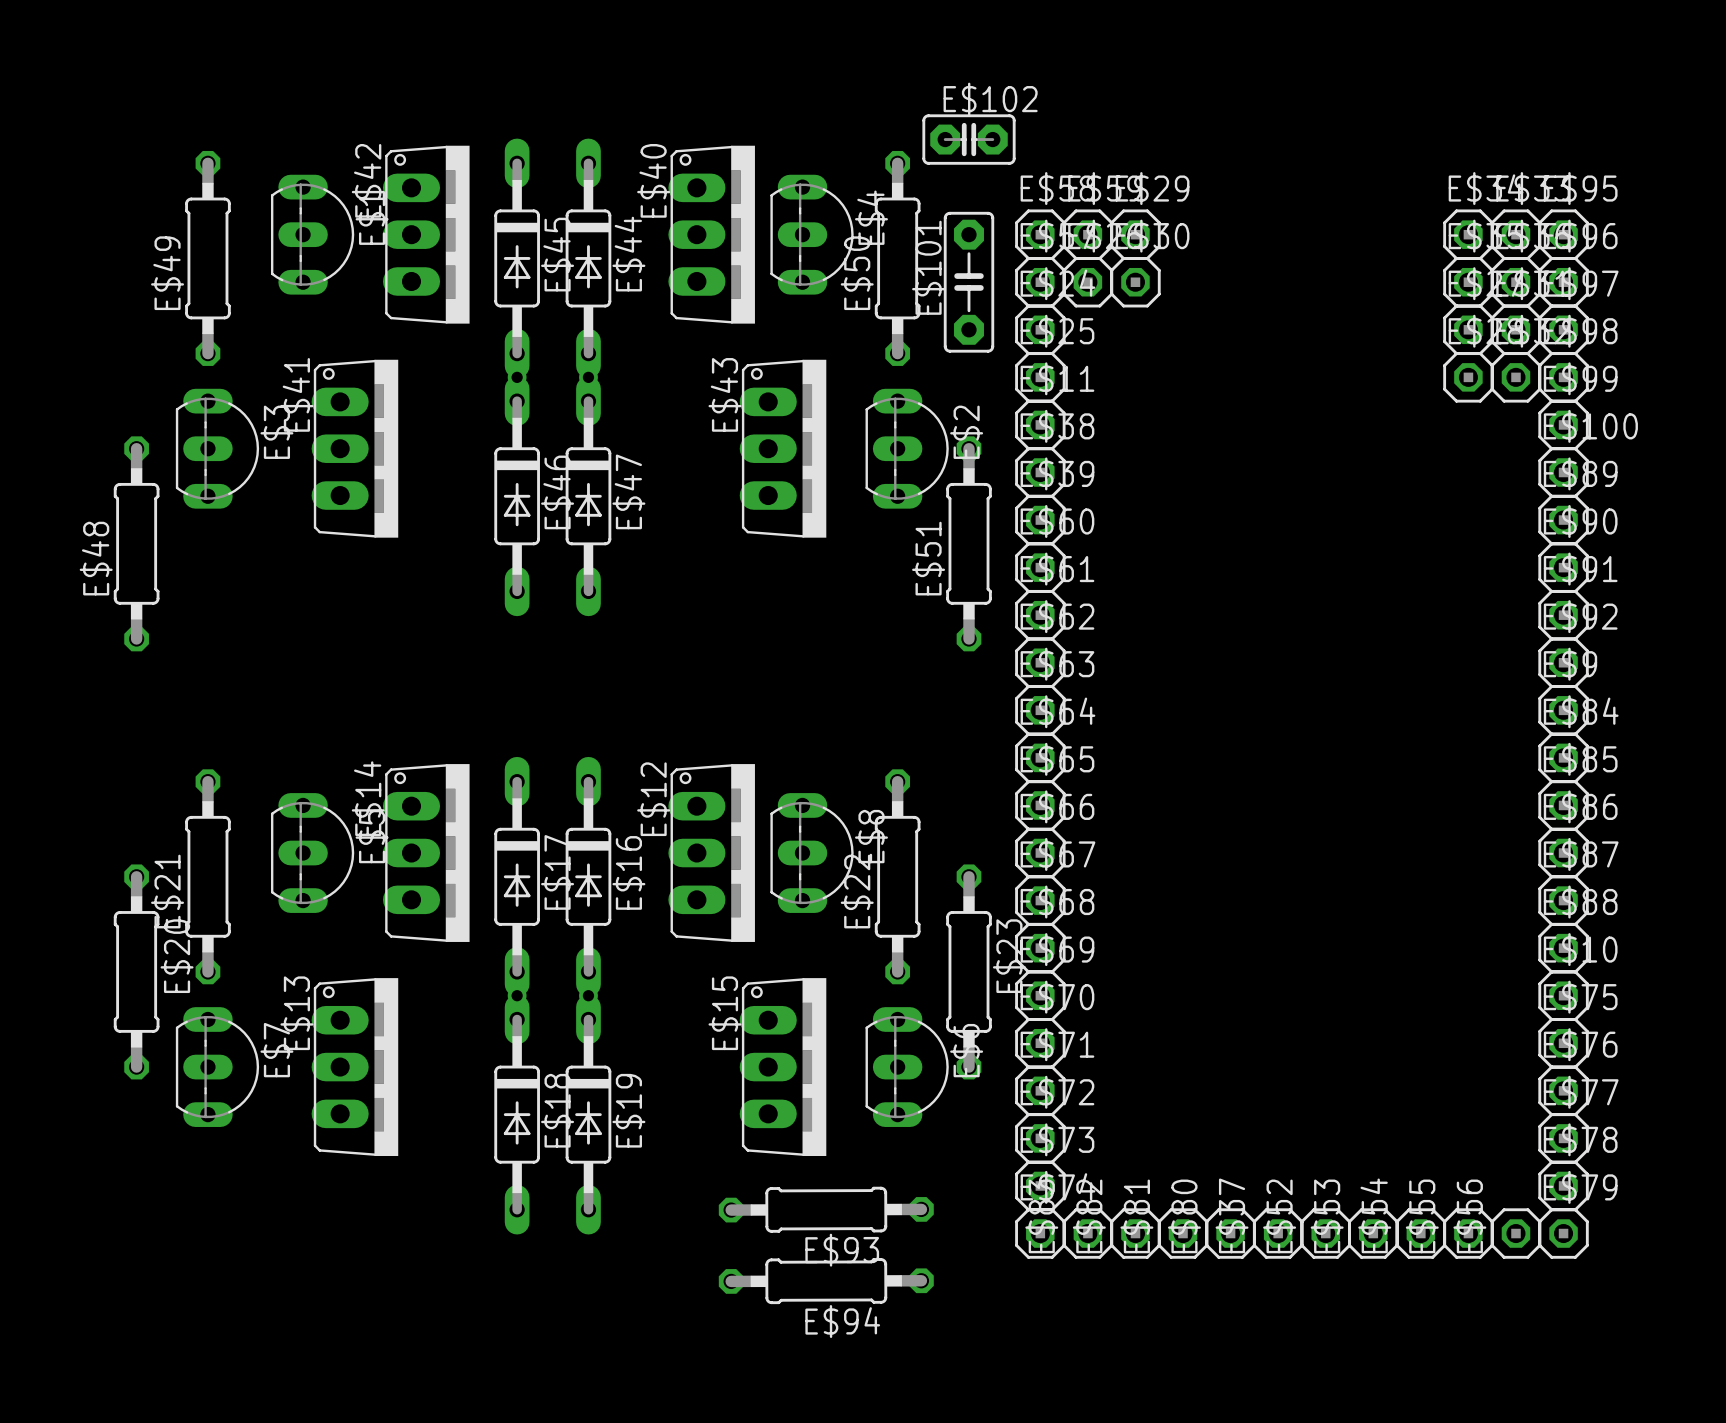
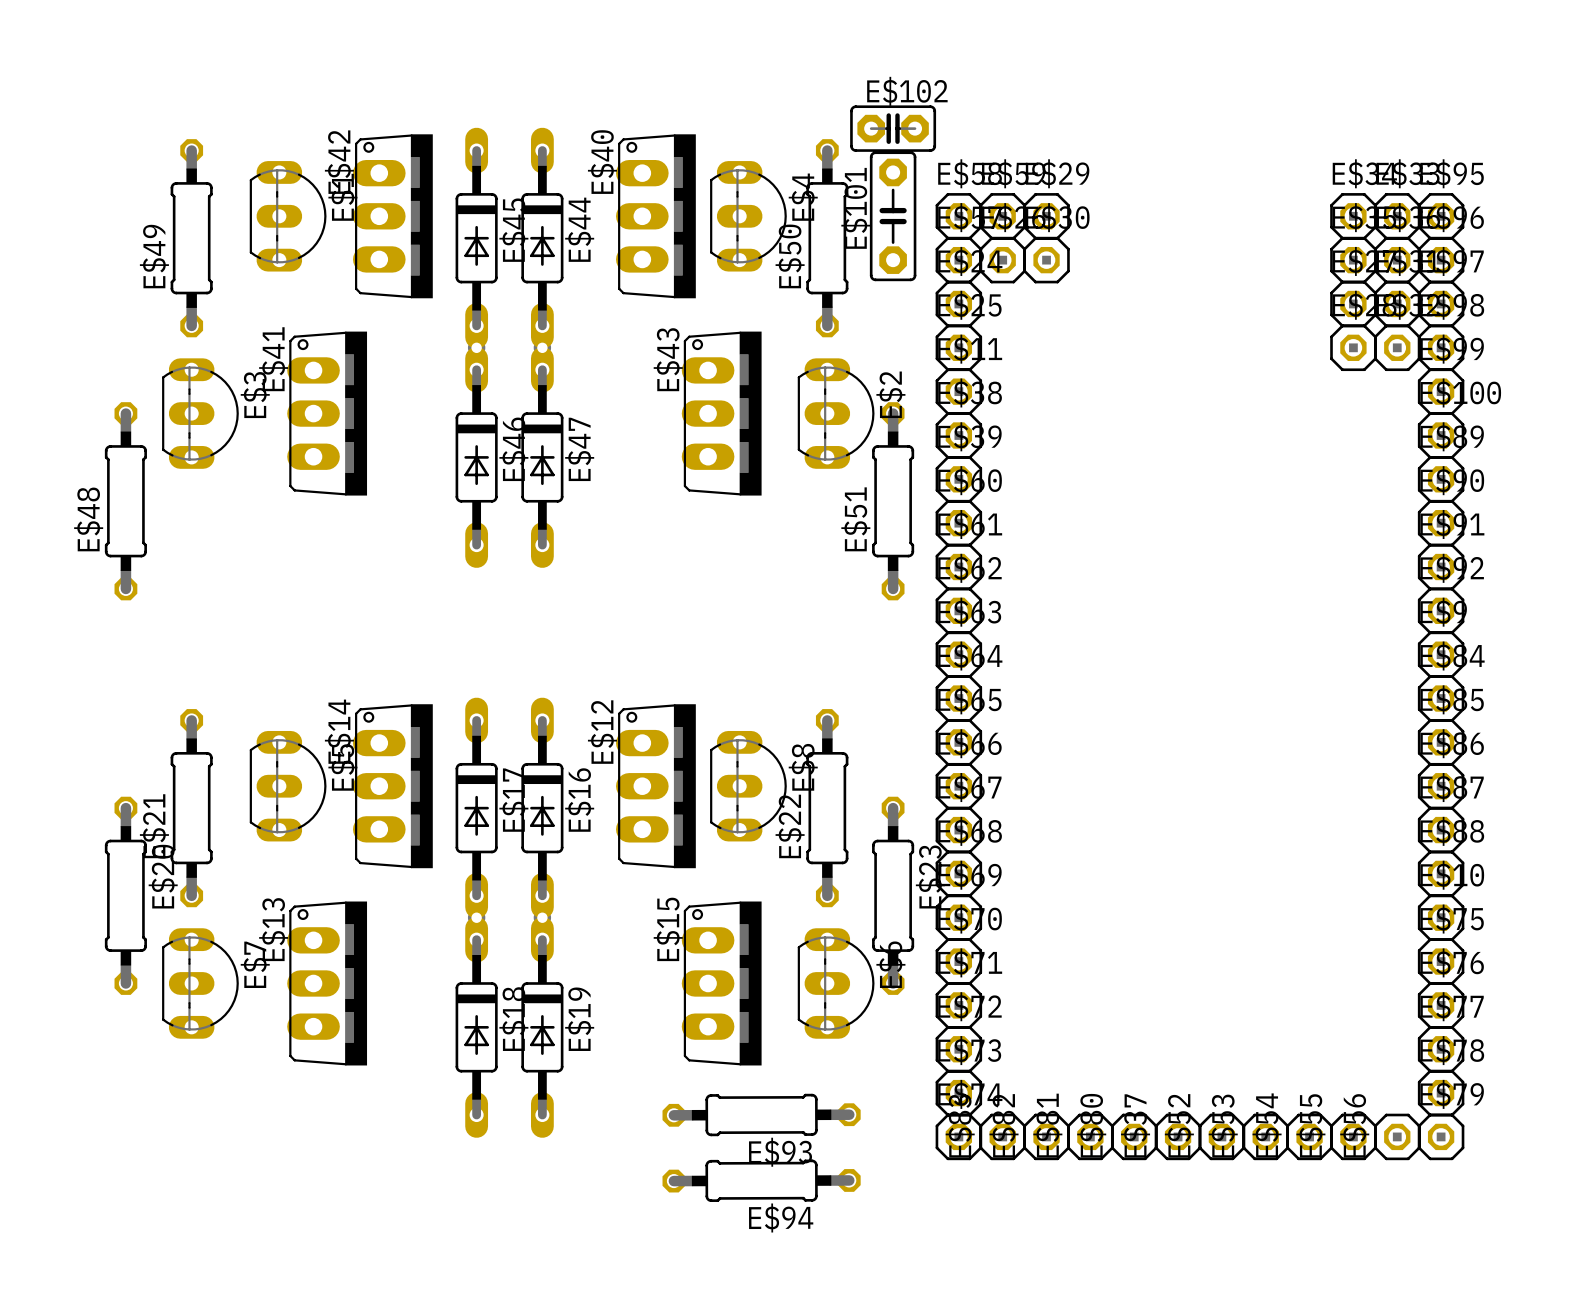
E$101 position: (968, 282) -> (893, 216)

